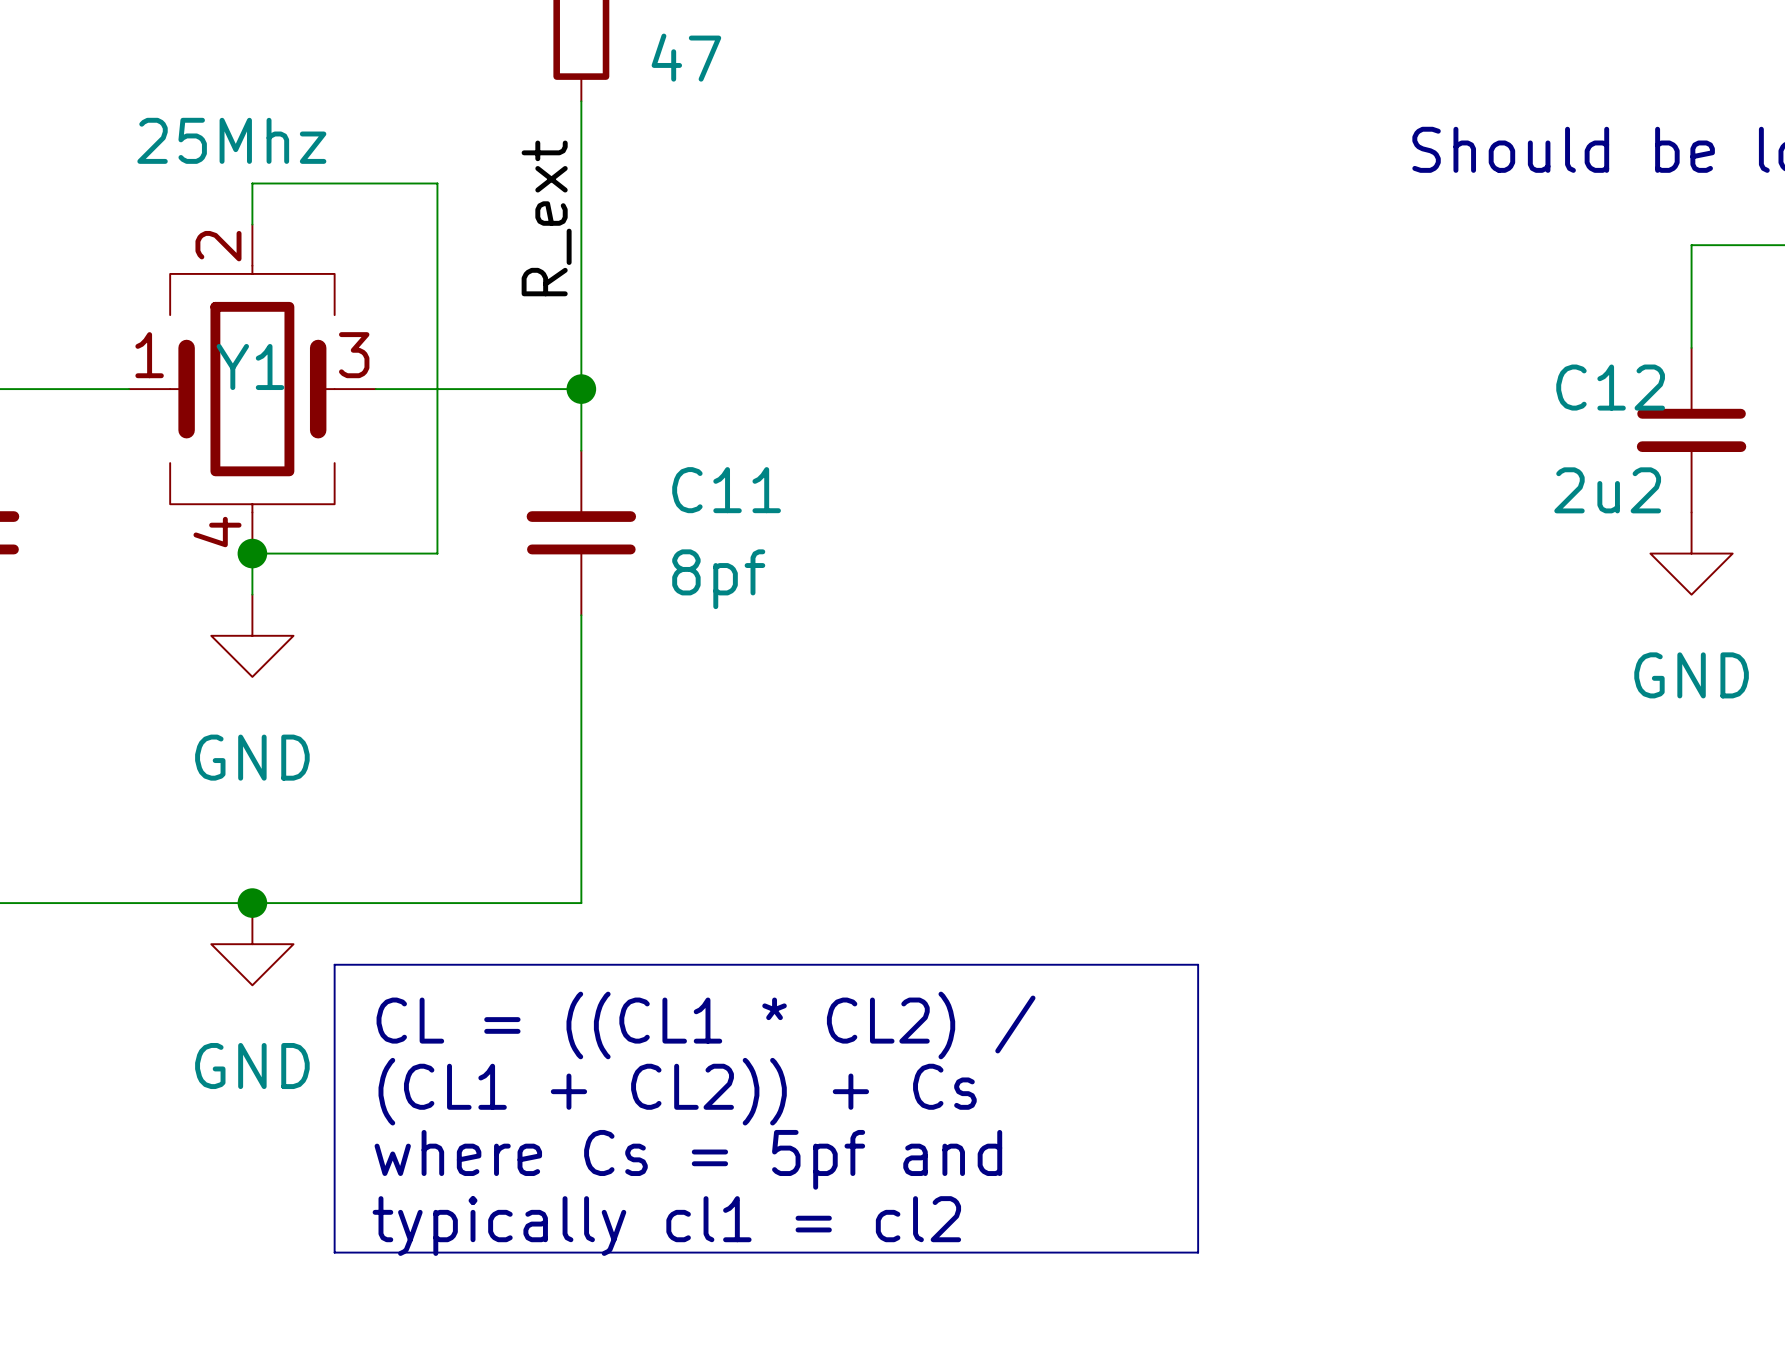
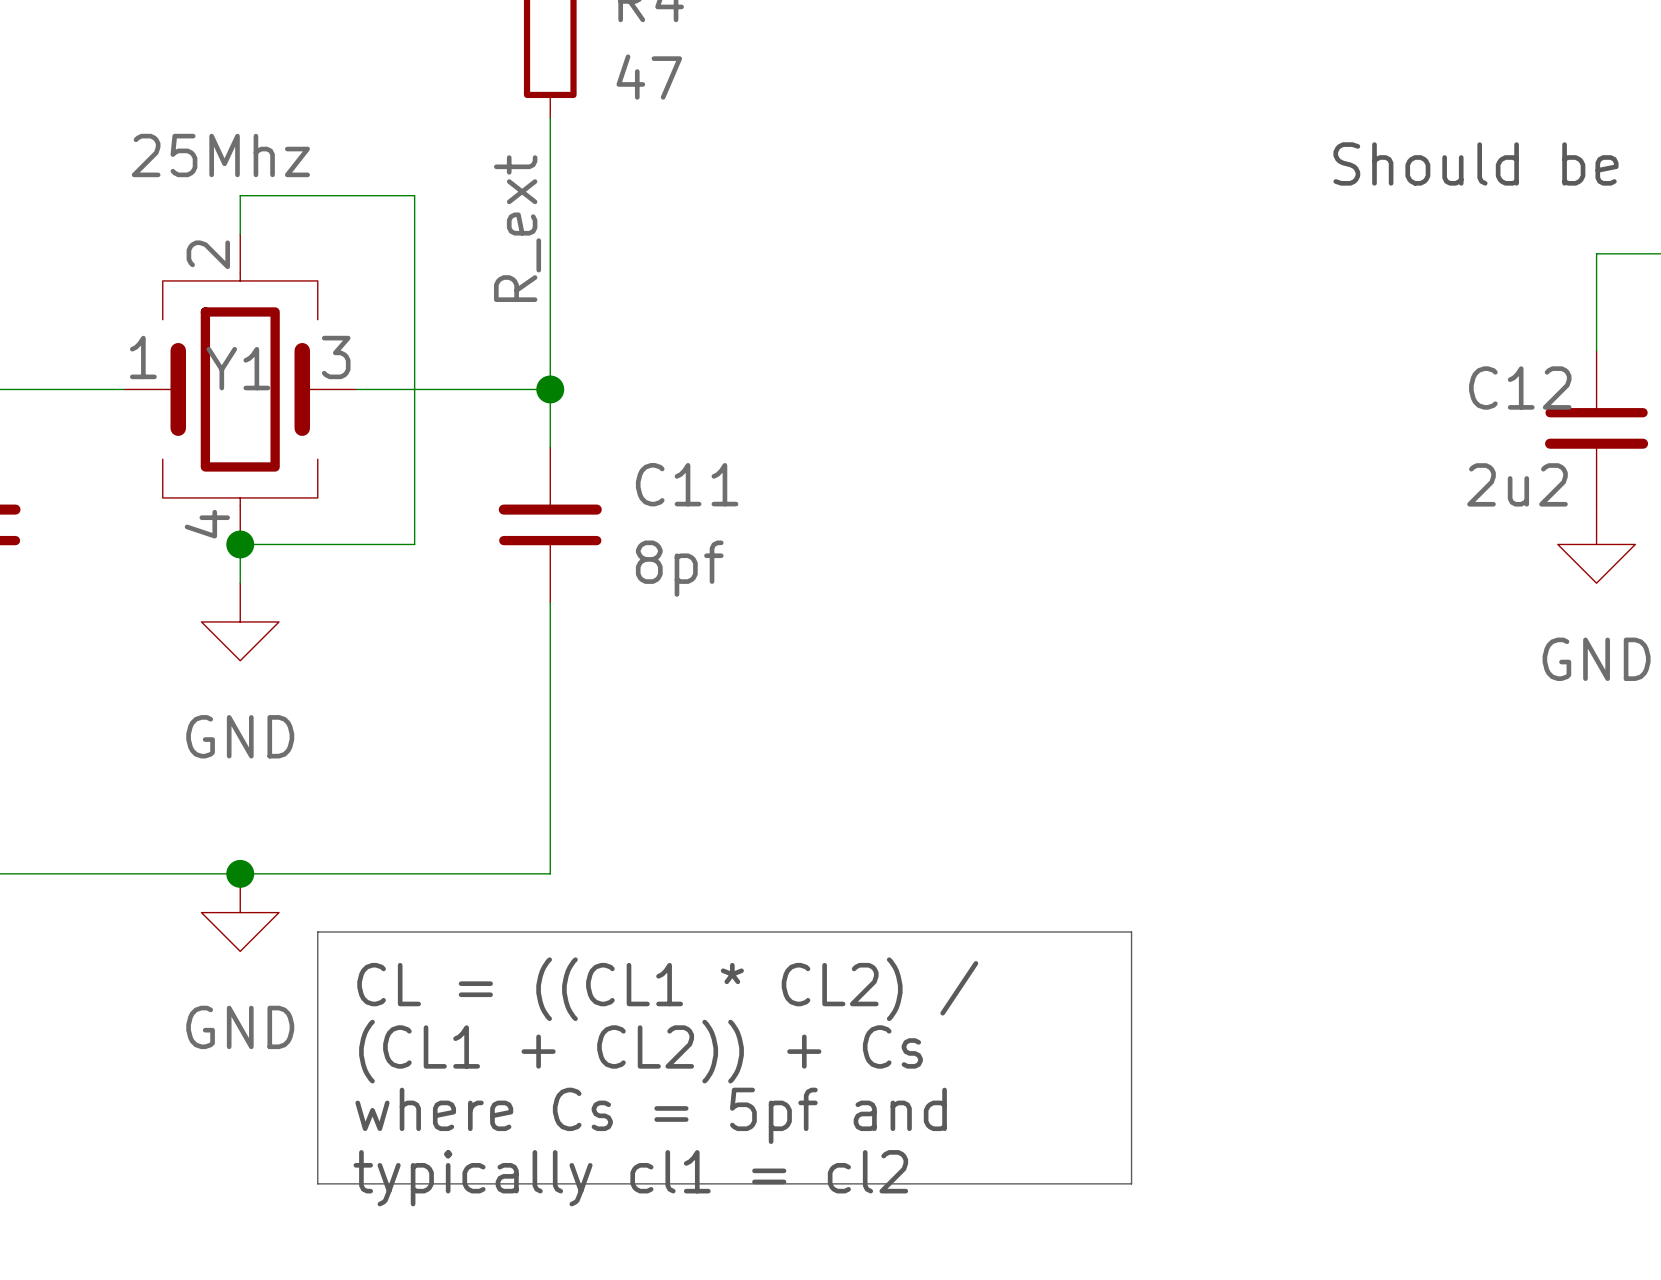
line: (334, 1232) (334, 1252) (1198, 1252) (1198, 1232) -> (317, 1183) (1131, 1183)

